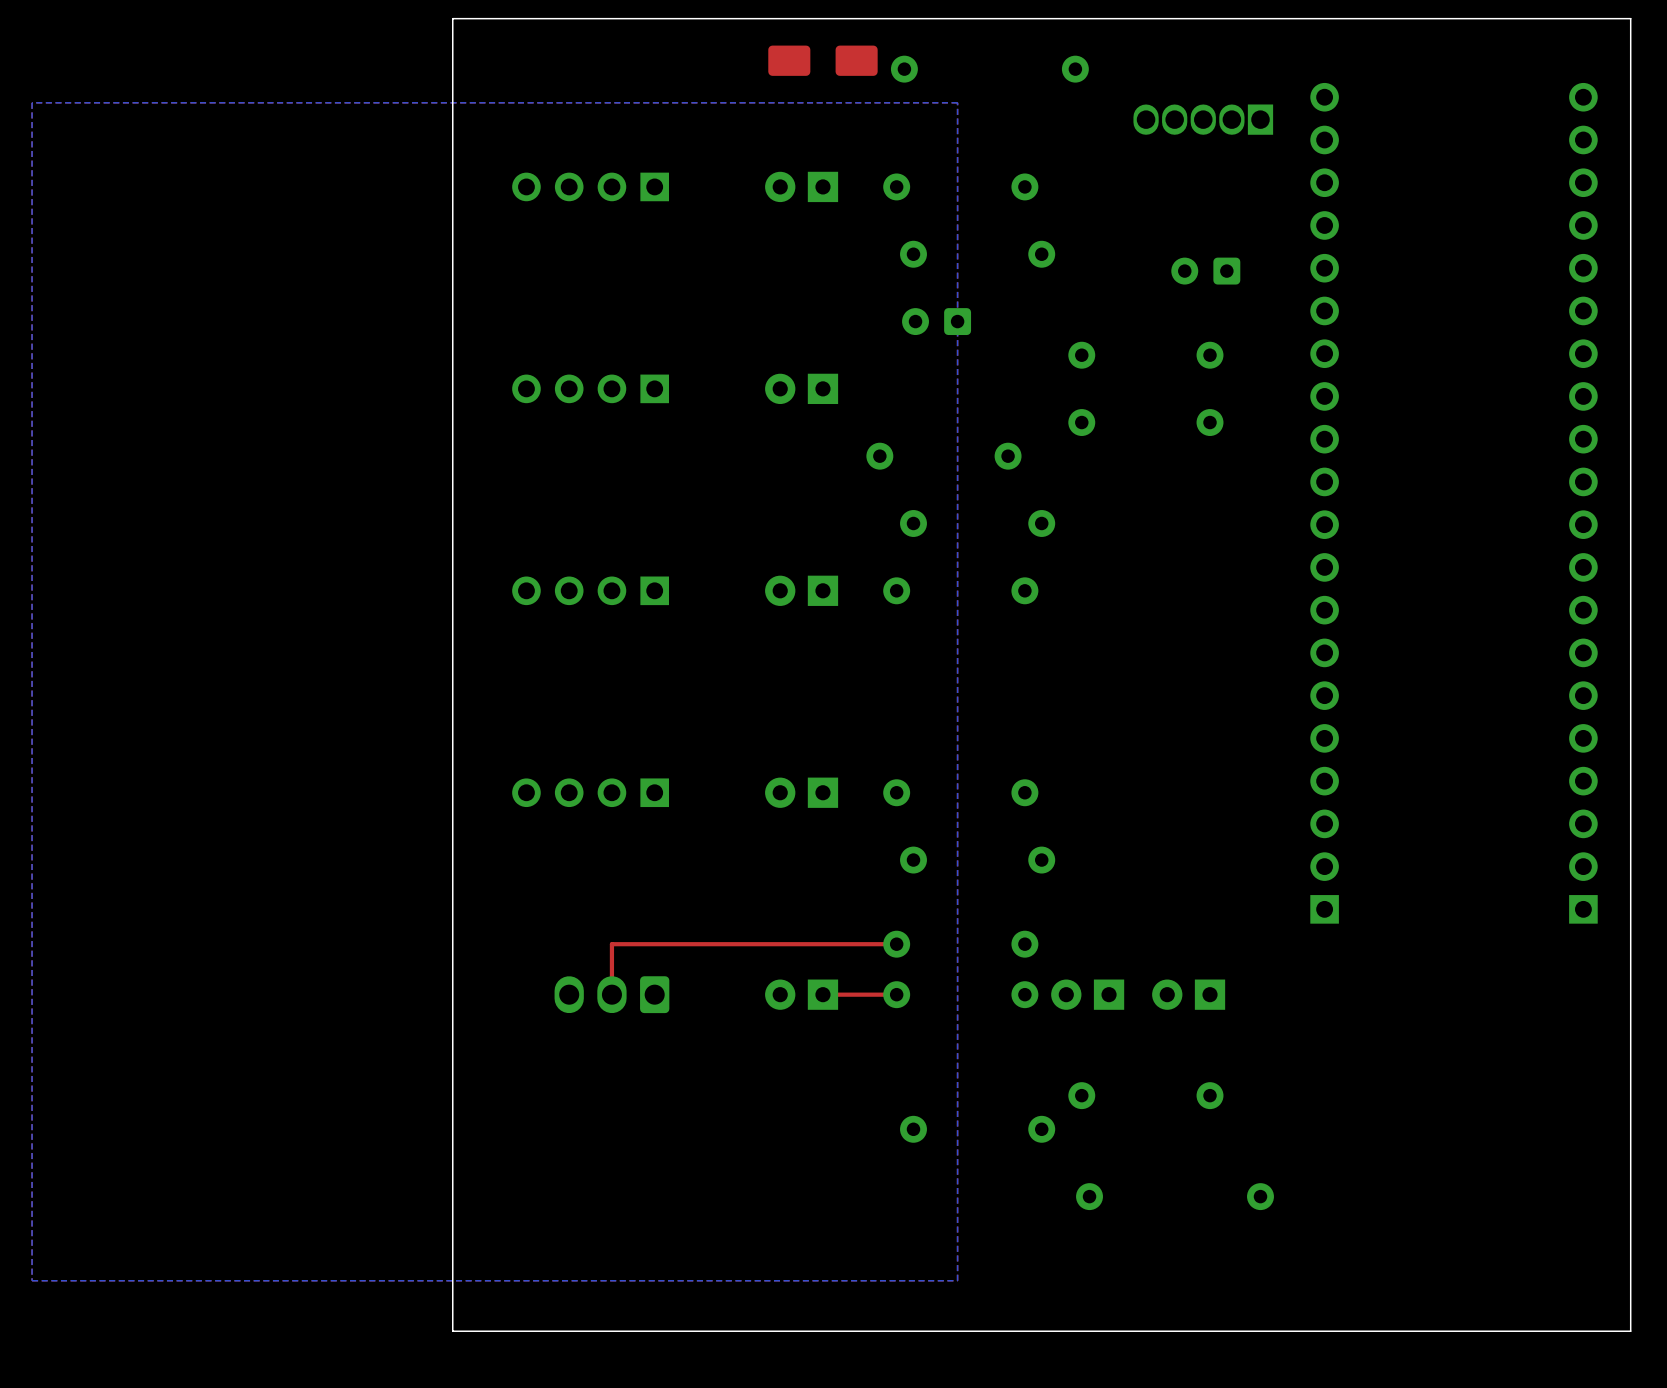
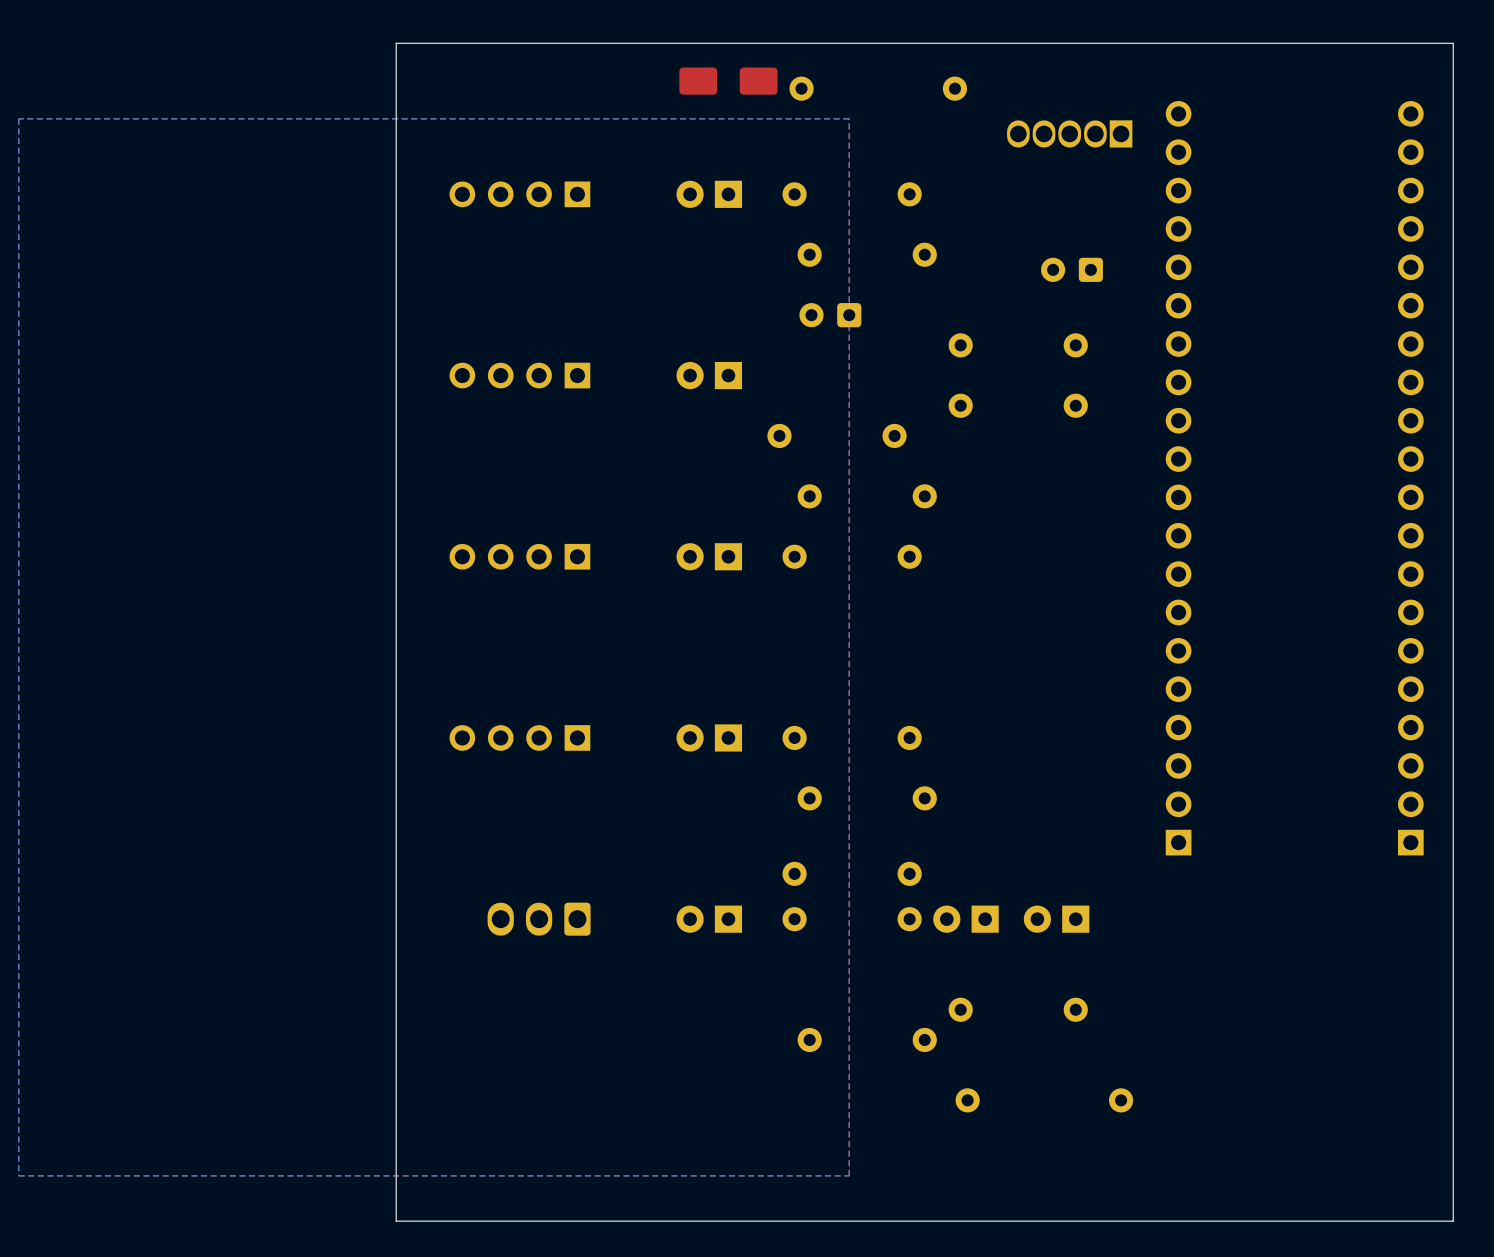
top track: (896, 944) (611, 944) (611, 994) -> none
top track: (896, 994) (822, 994) -> none

